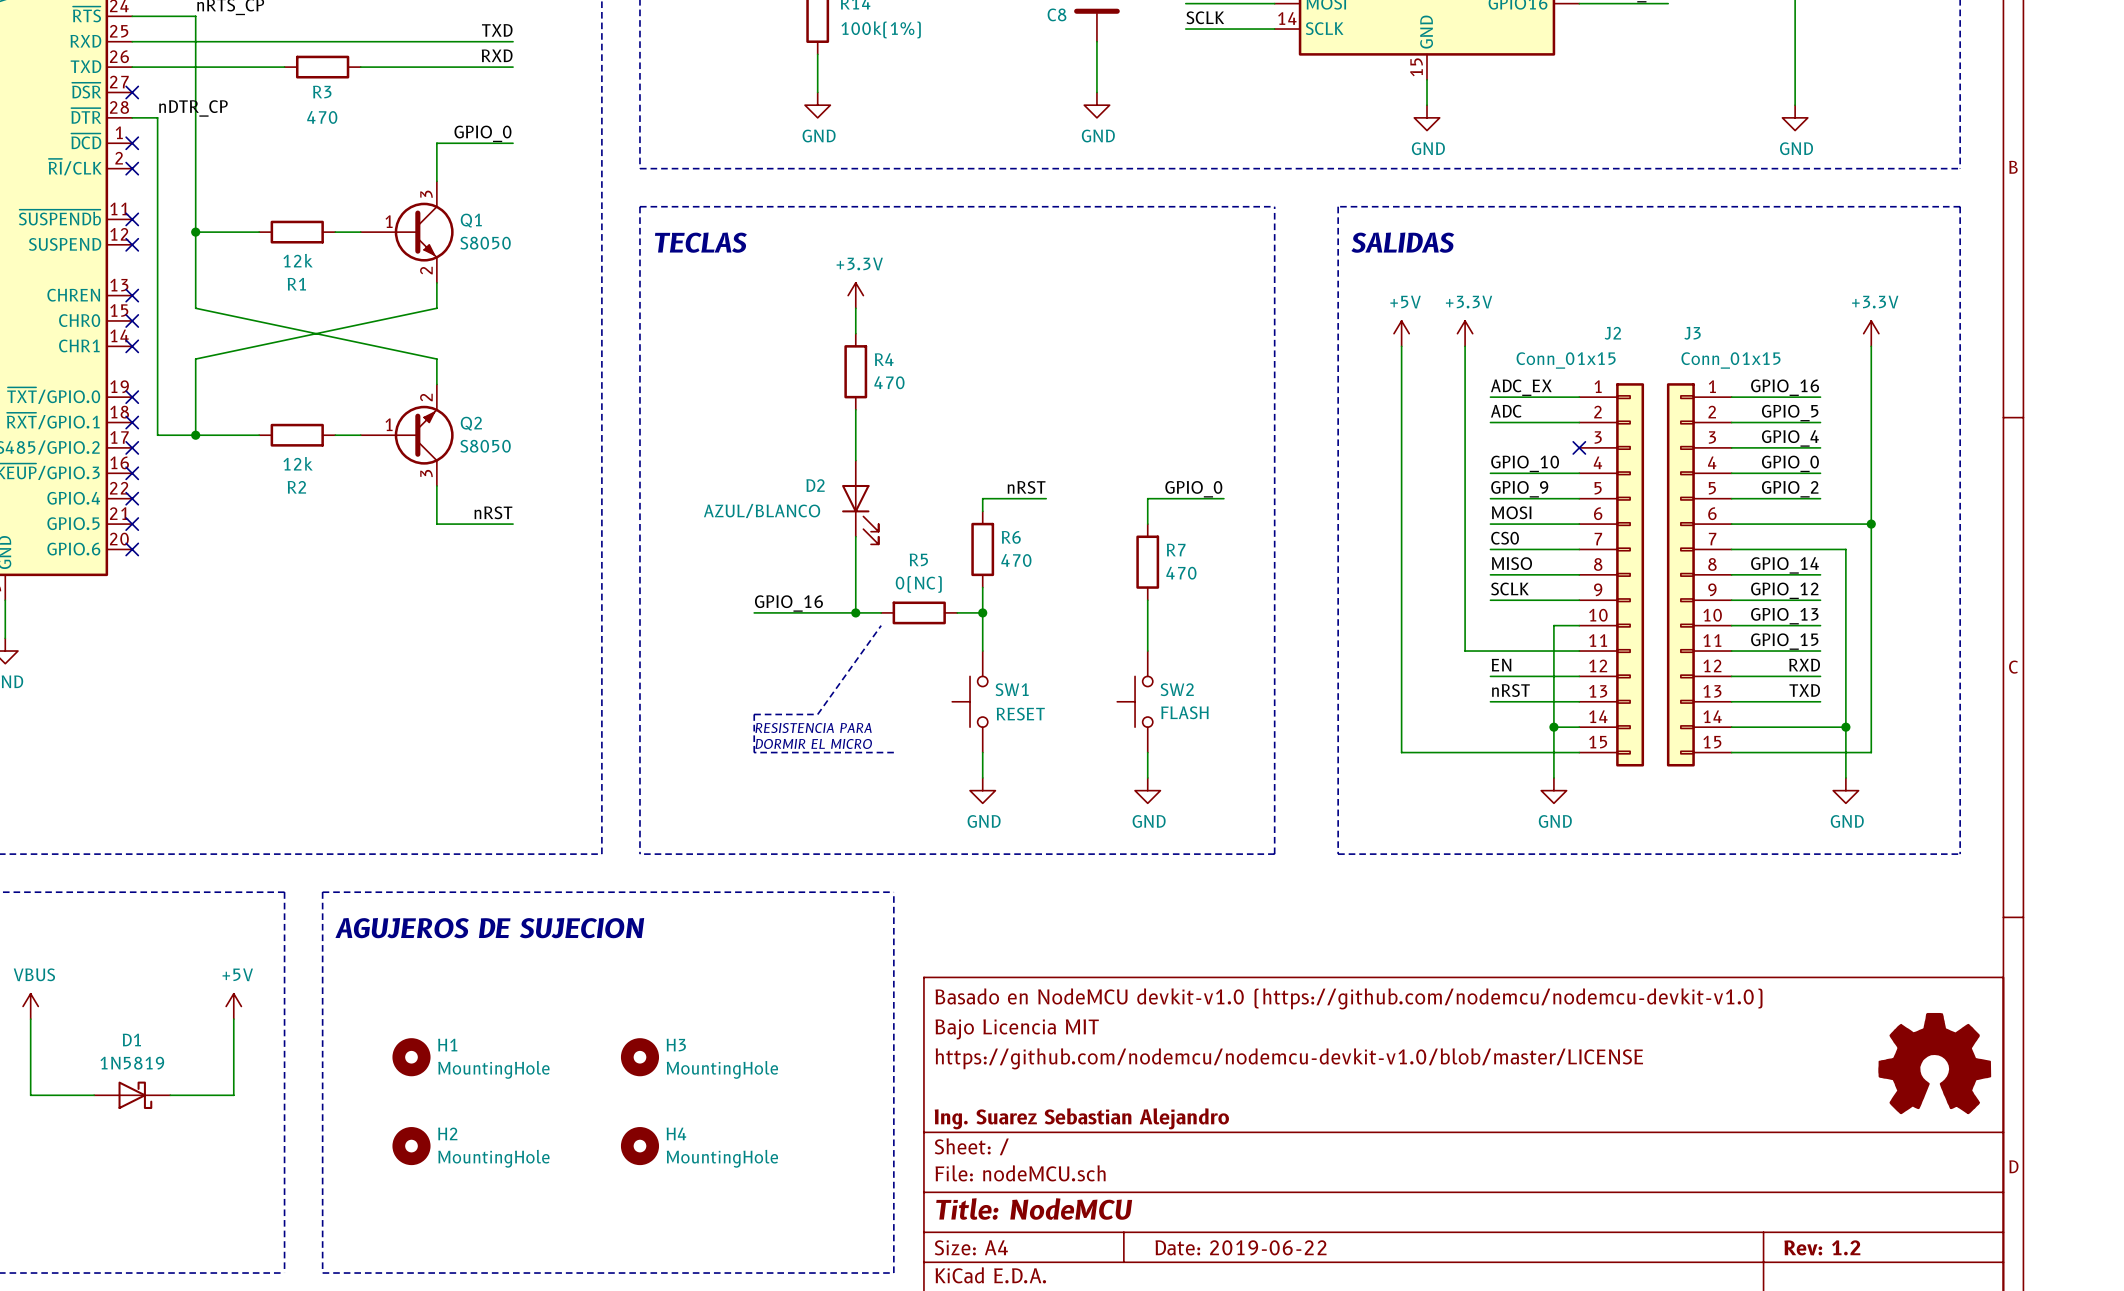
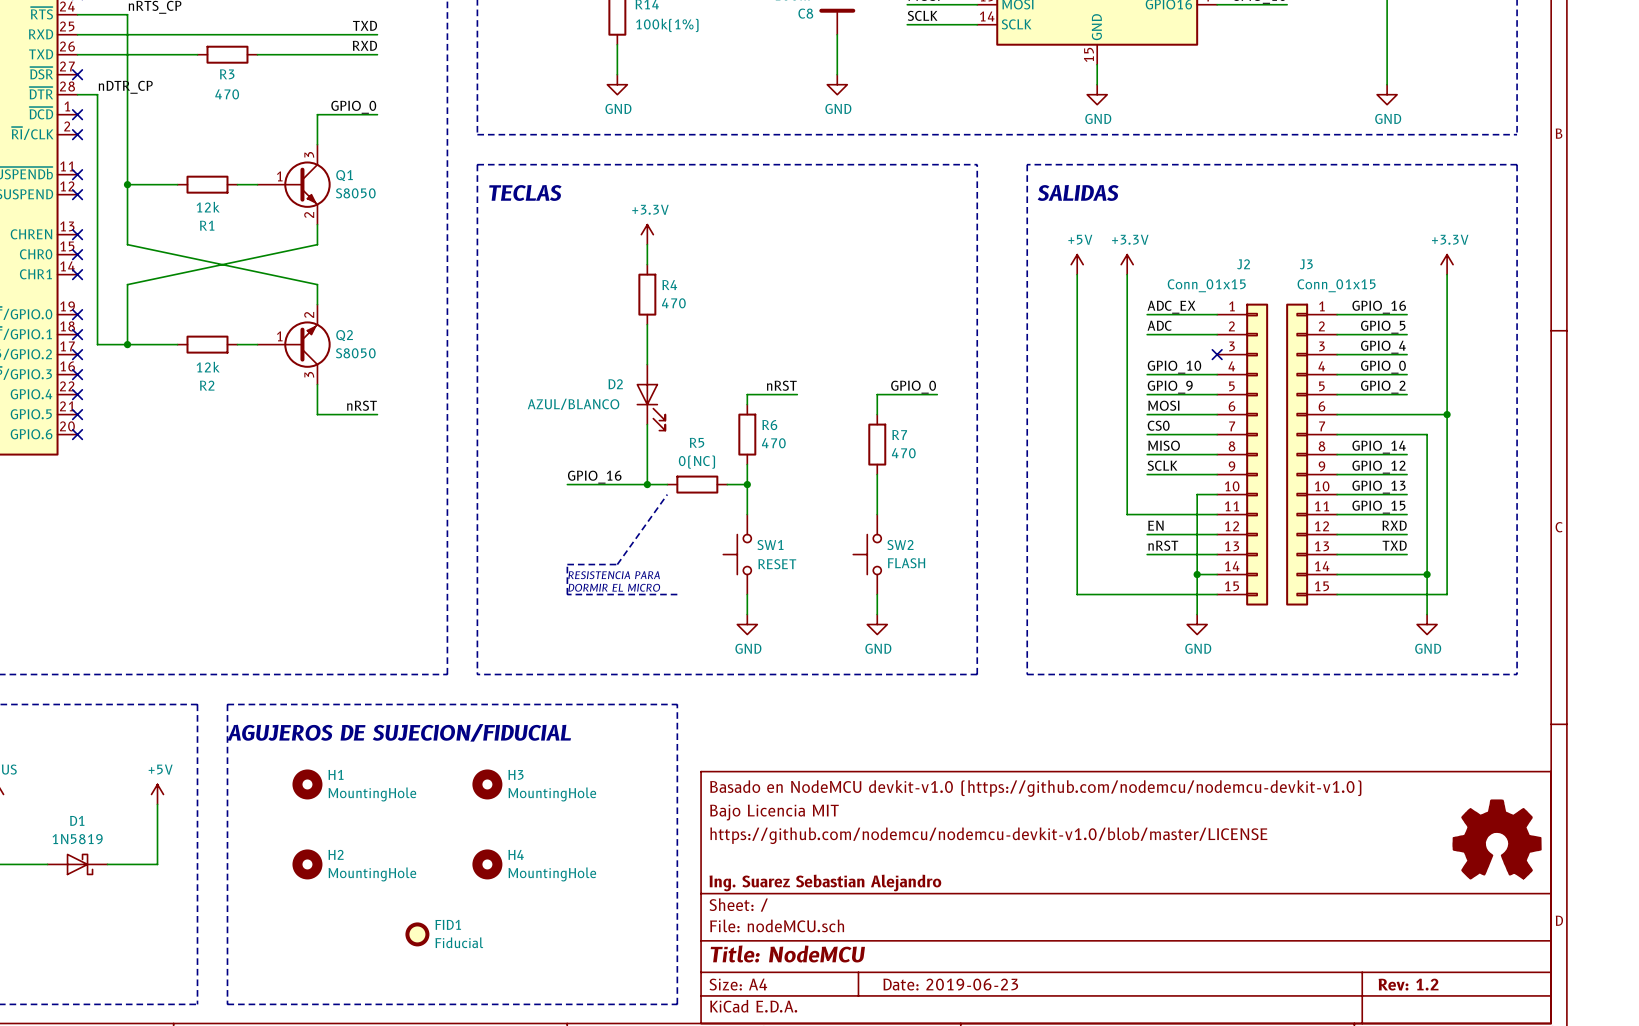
text: AGUJEROS DE SUJECION (489, 928) -> AGUJEROS DE SUJECION/FIDUCIAL (399, 732)
H1 position: (411, 1057) -> (307, 784)
H3 position: (639, 1057) -> (487, 784)
H2 position: (411, 1146) -> (307, 864)
H4 position: (639, 1146) -> (487, 864)
FID1: none -> Fiducial (417, 934)
title block: Date: 2019-06-22 (1241, 1247) -> Date: 2019-06-23 (950, 984)

